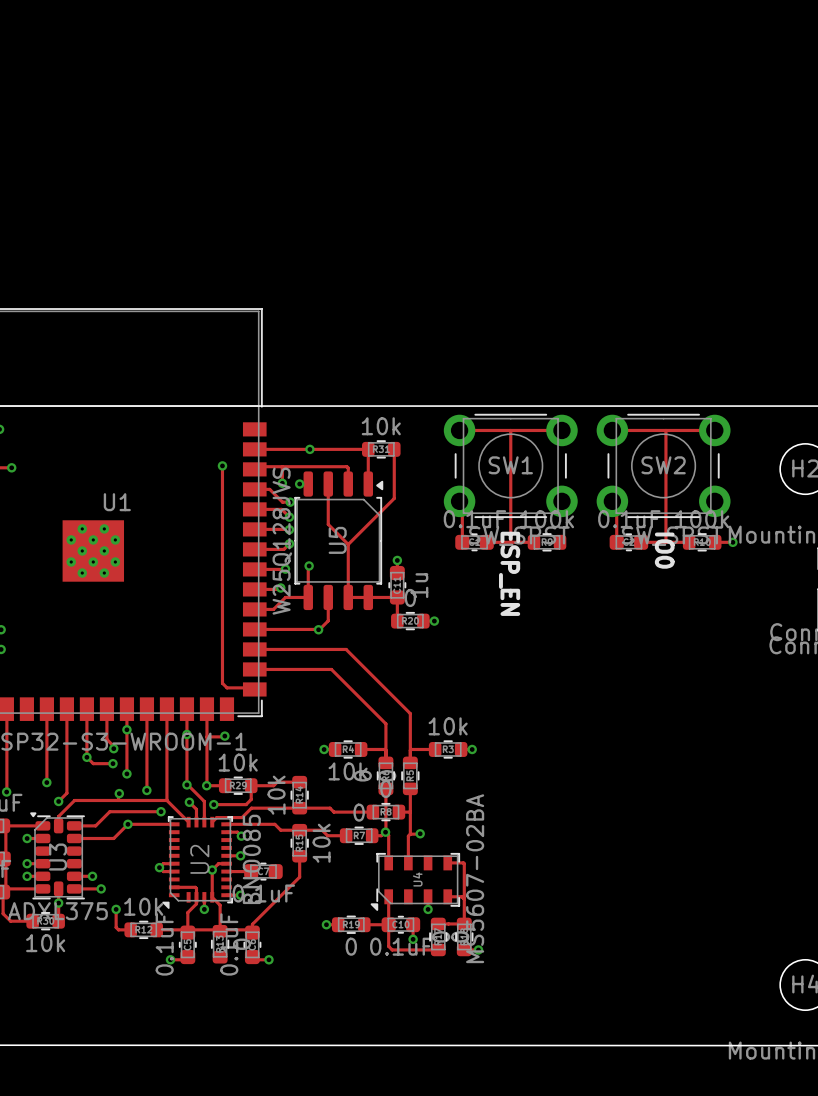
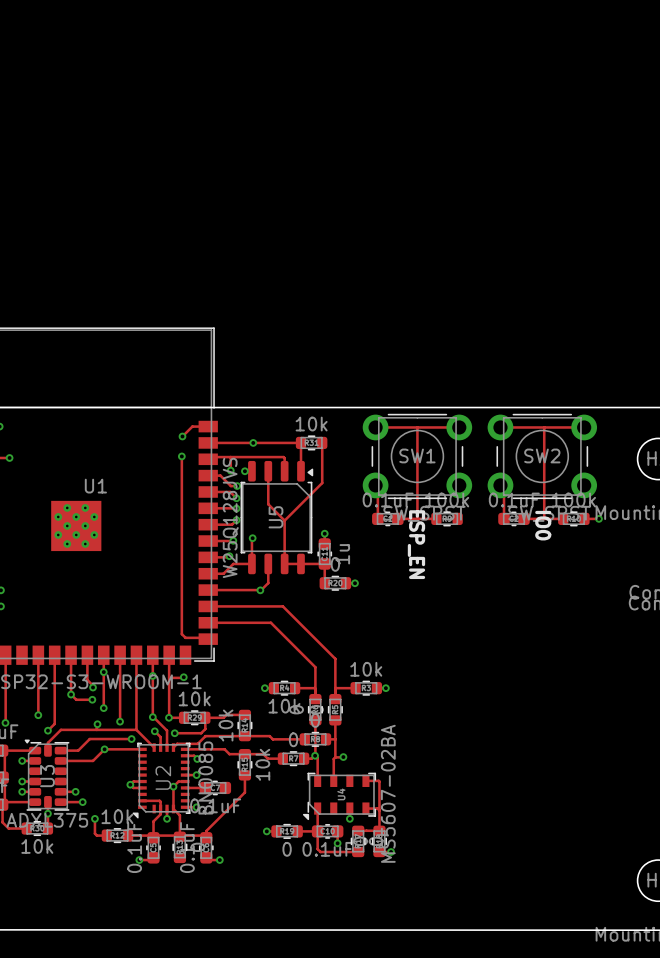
track: none -> (208, 426) (192, 426) (182, 436)
via: none -> (182, 436)

